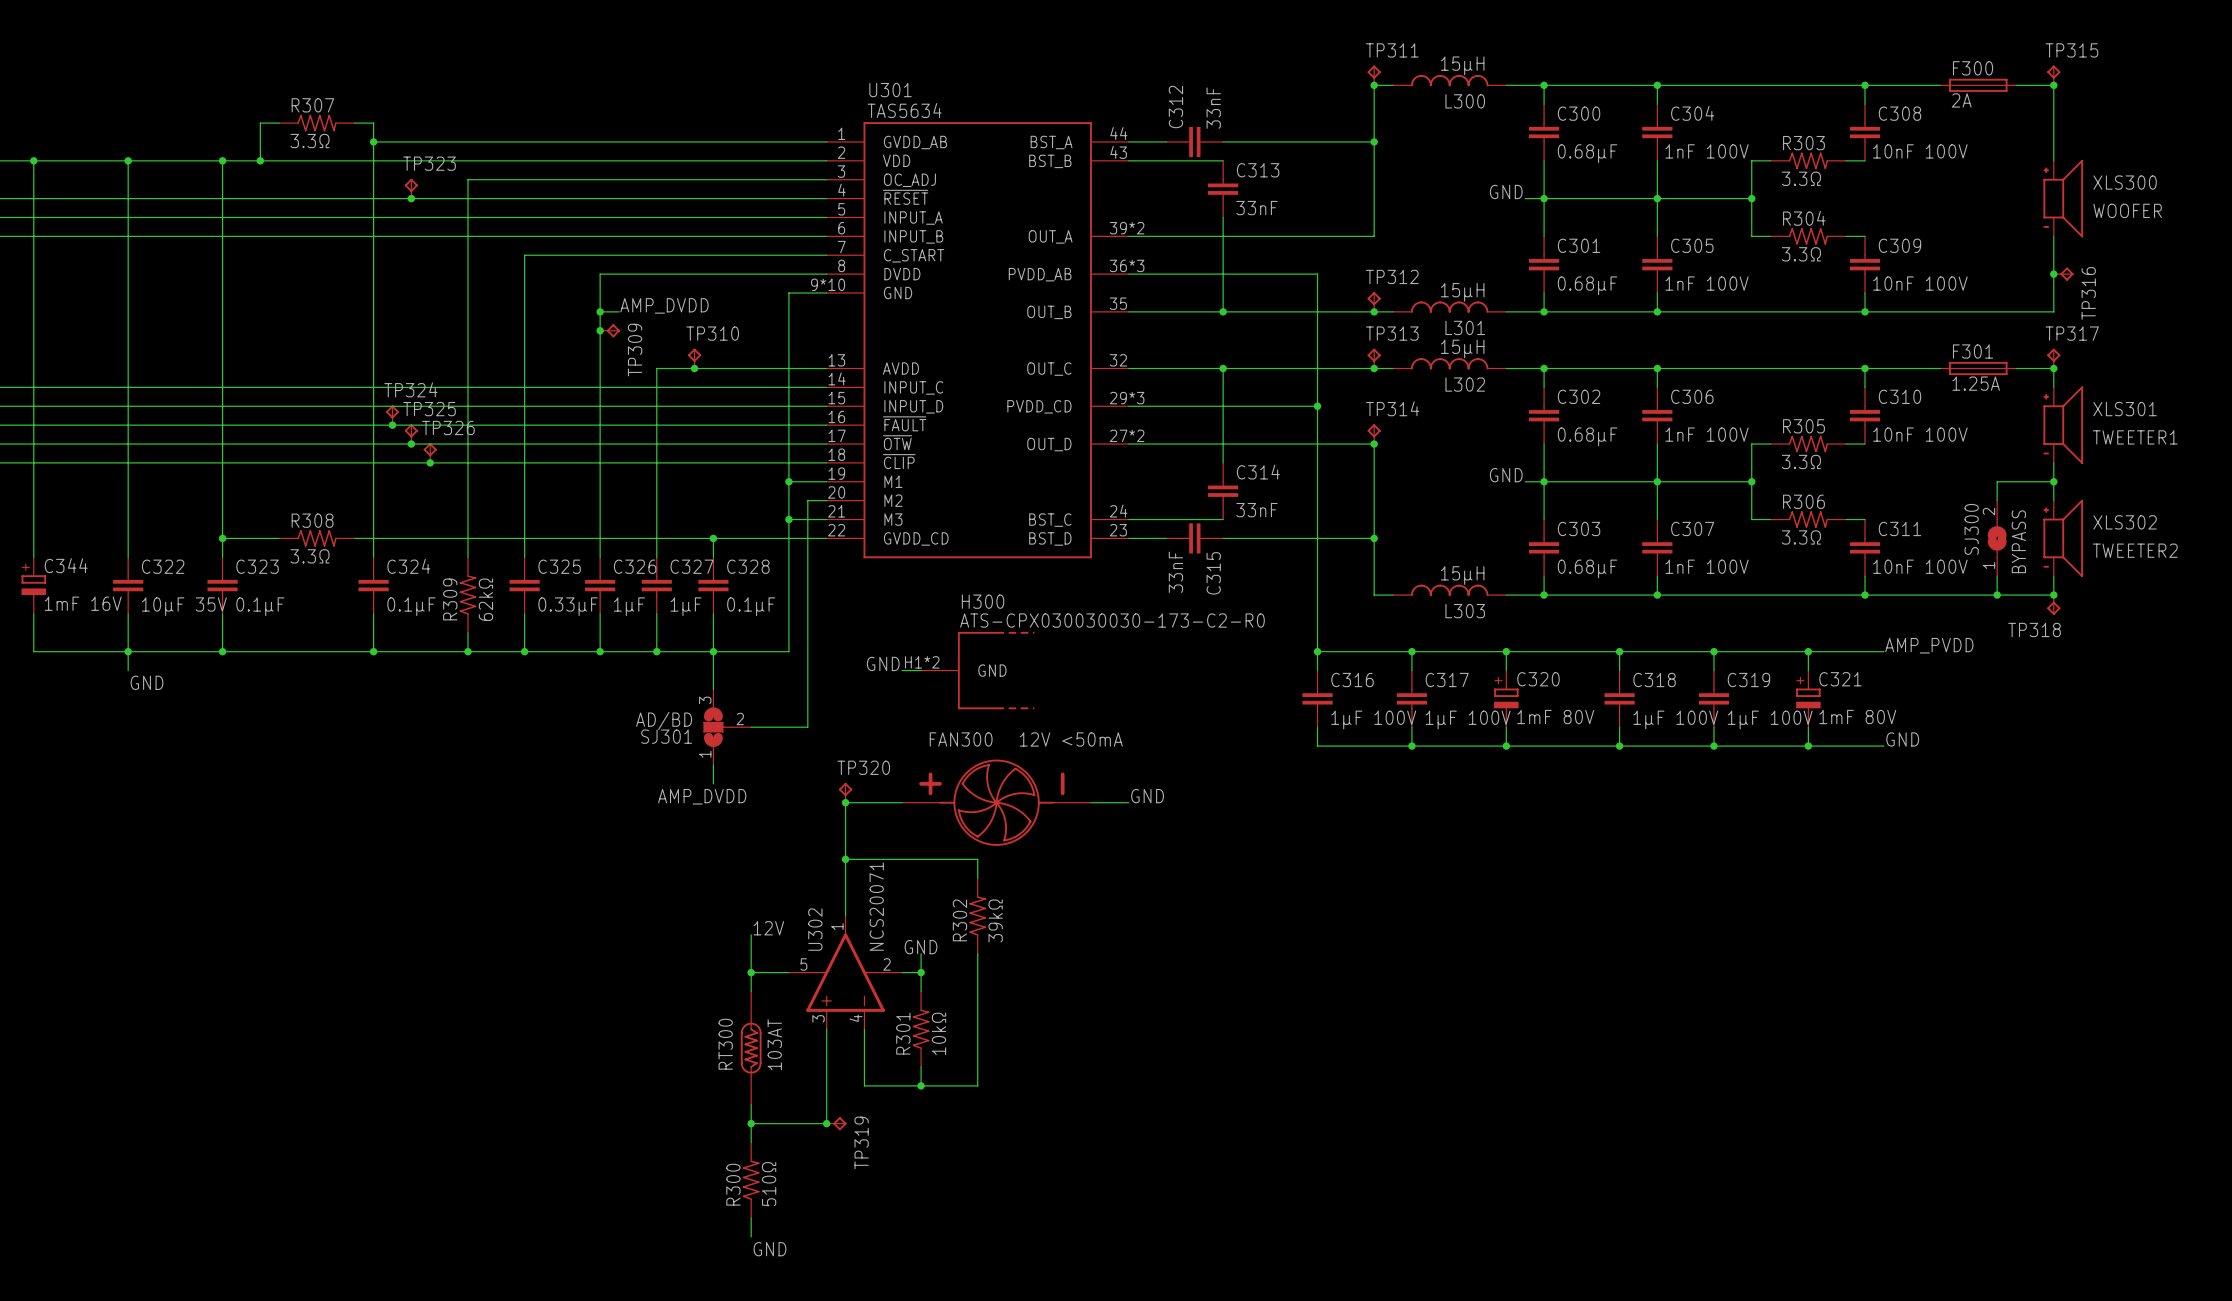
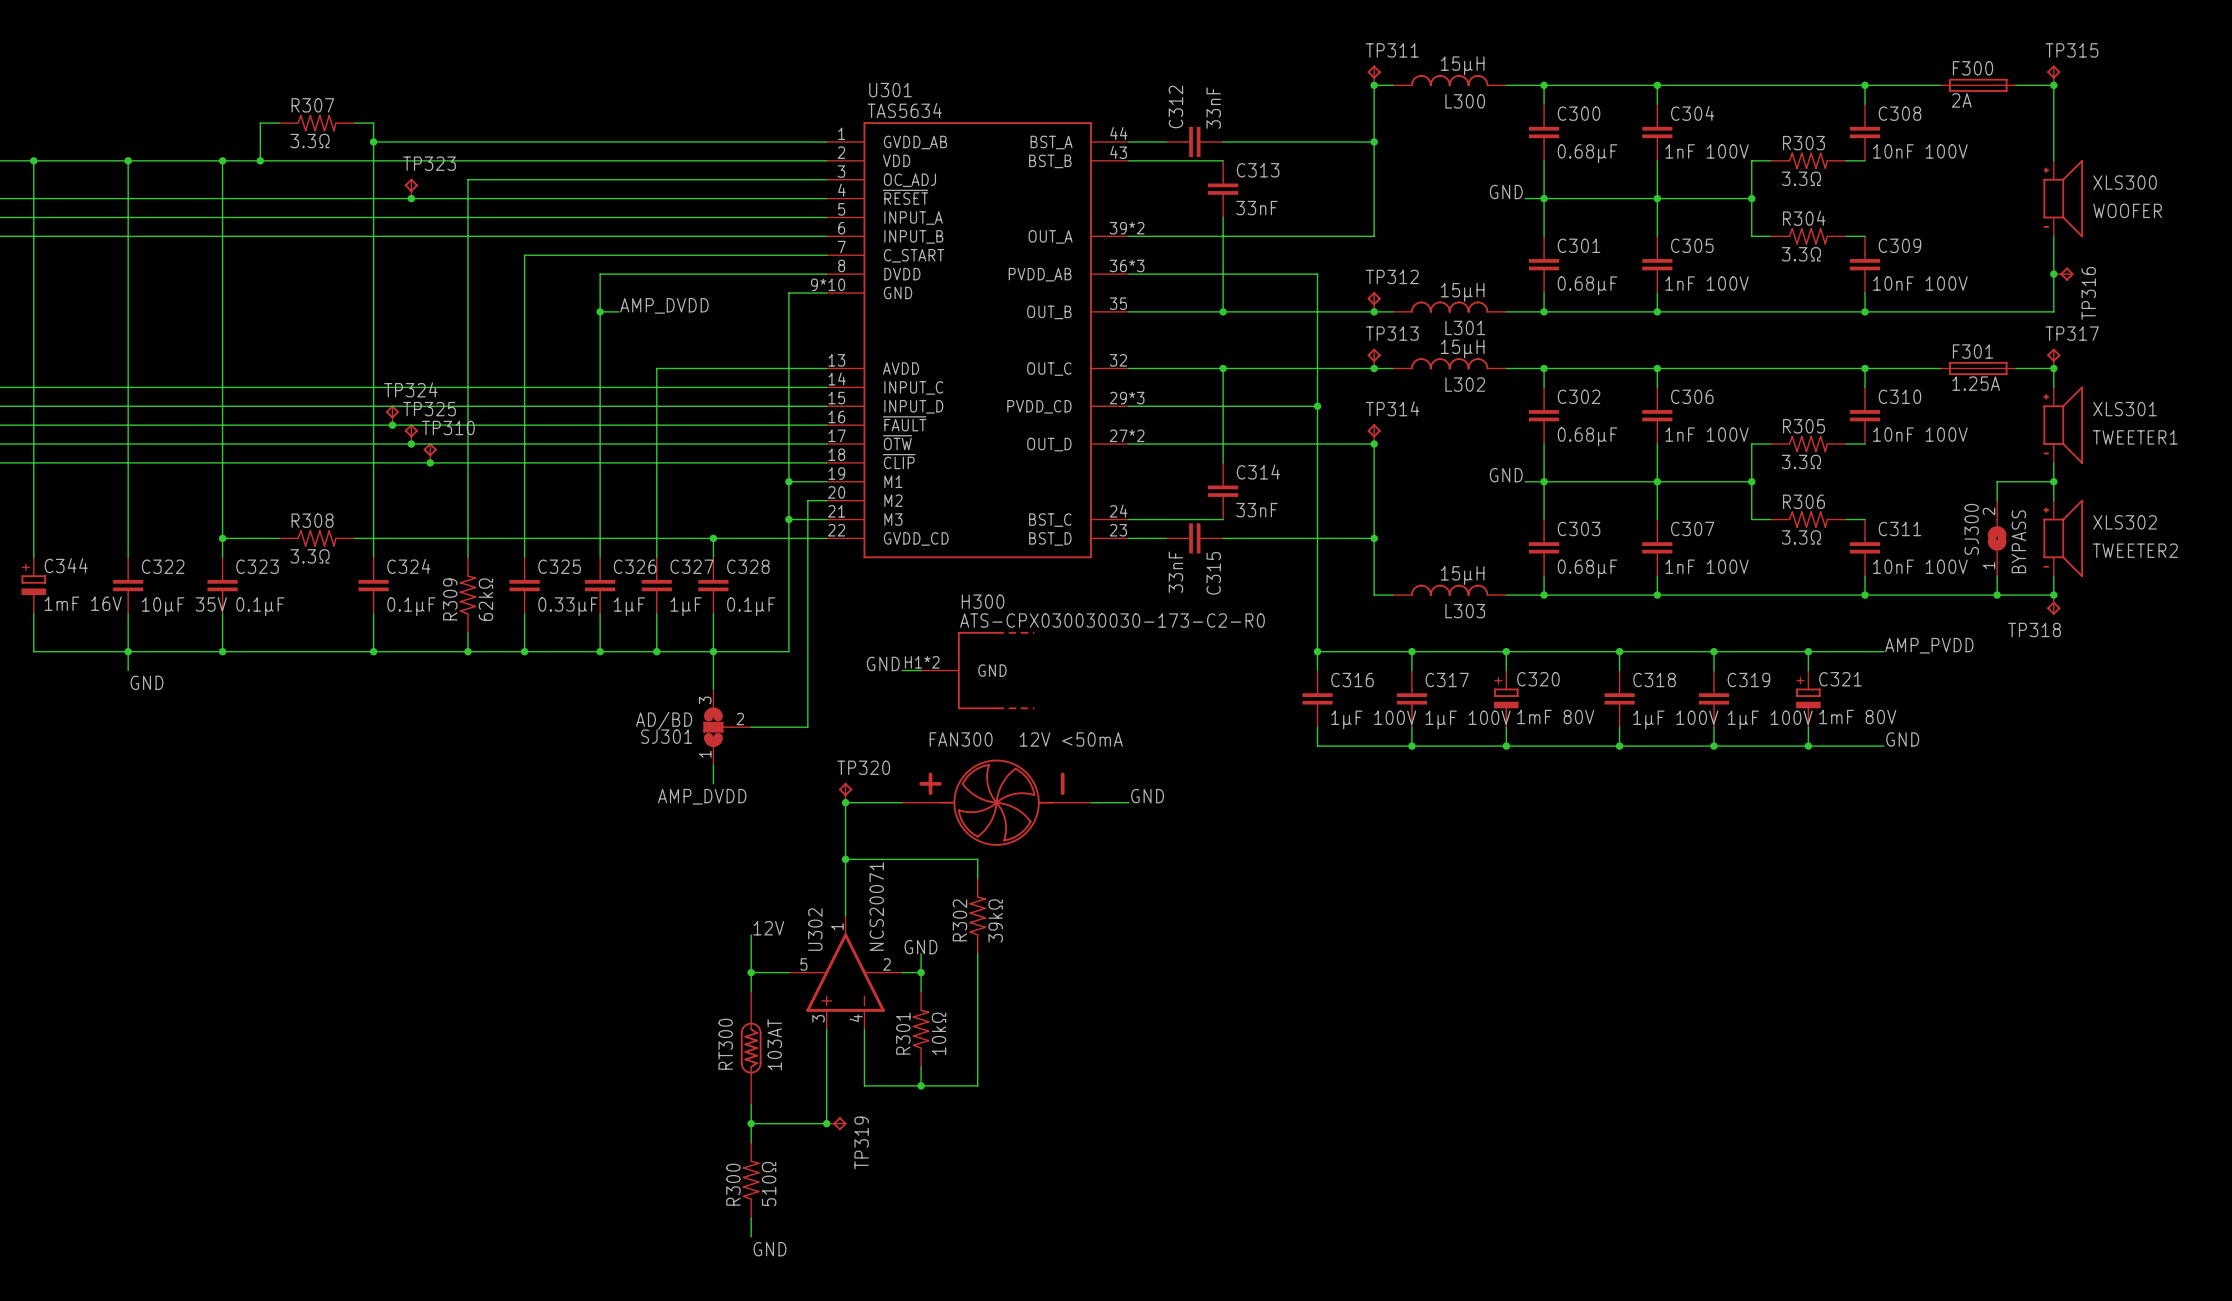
junction: (600, 330) -> none
TP309: (610, 330) -> none
TP310: (694, 358) -> none
junction: (694, 368) -> none
TP326 name: TP326 (448, 427) -> TP310 (448, 427)

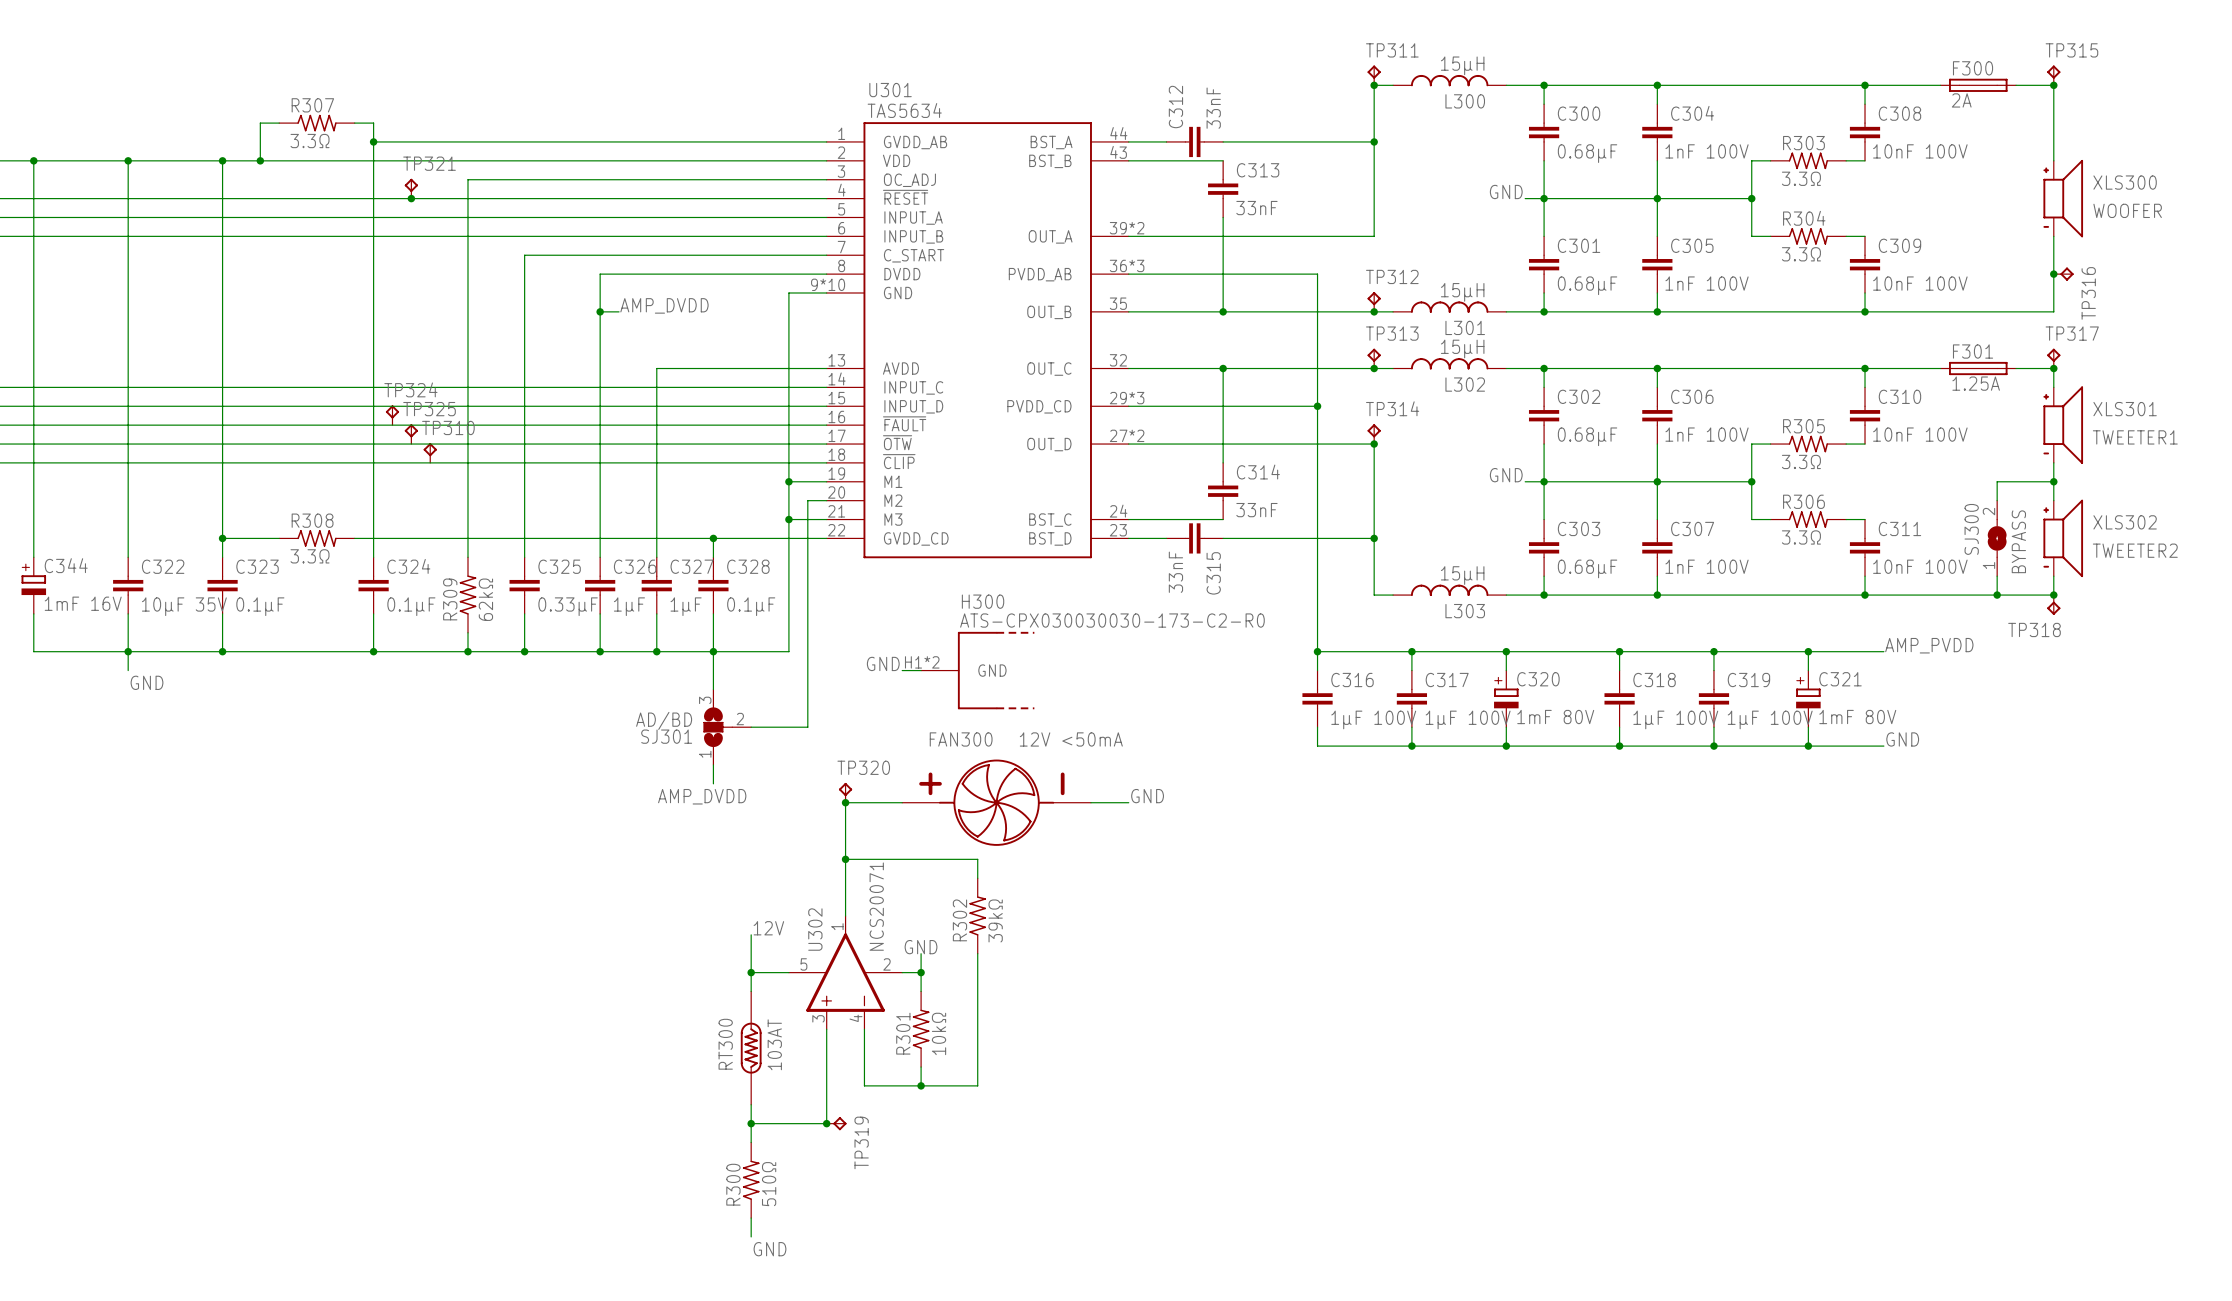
TP323 name: TP323 (429, 163) -> TP321 (429, 163)
junction: (392, 425) -> none
junction: (411, 444) -> none
junction: (430, 462) -> none

